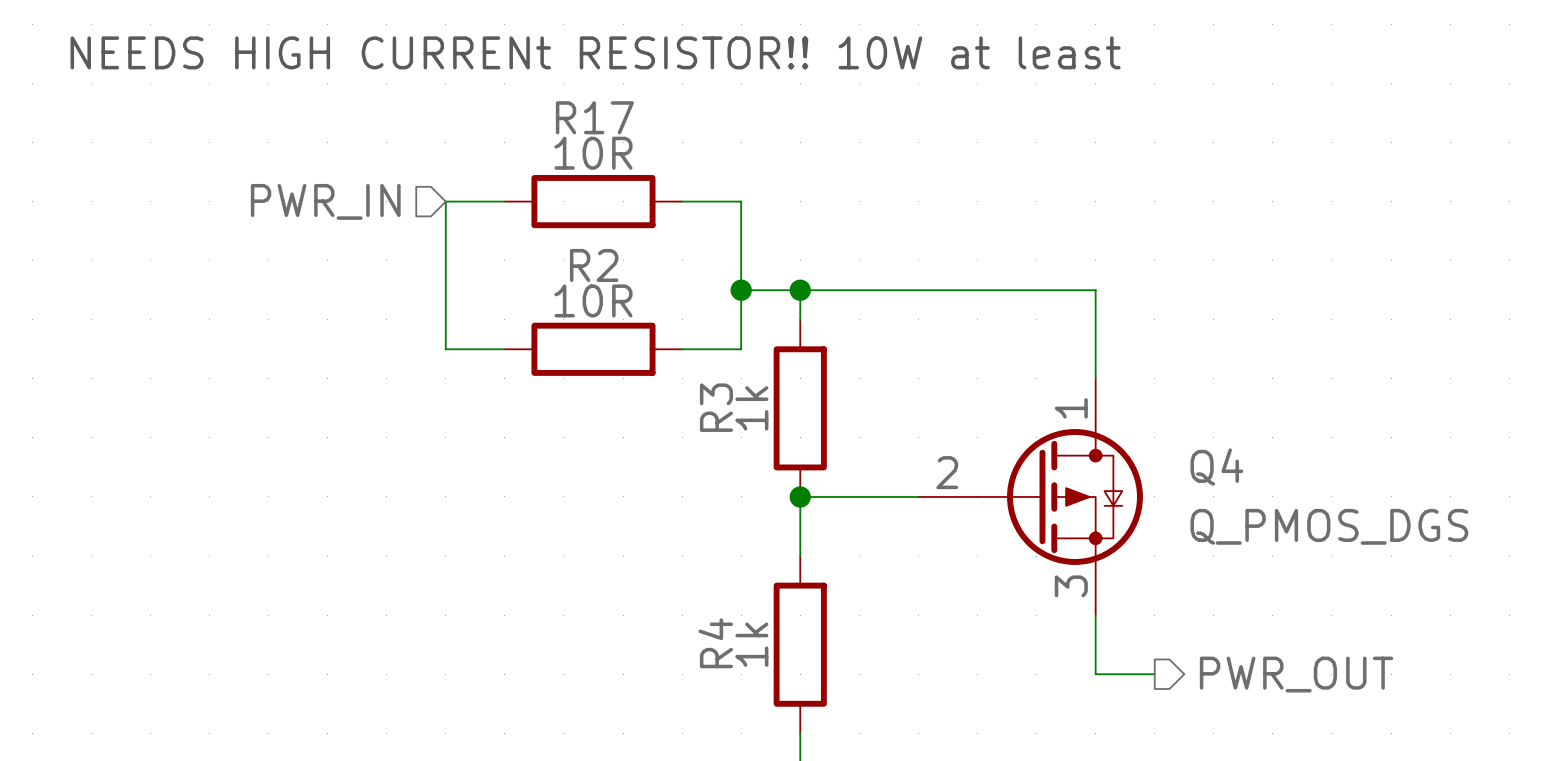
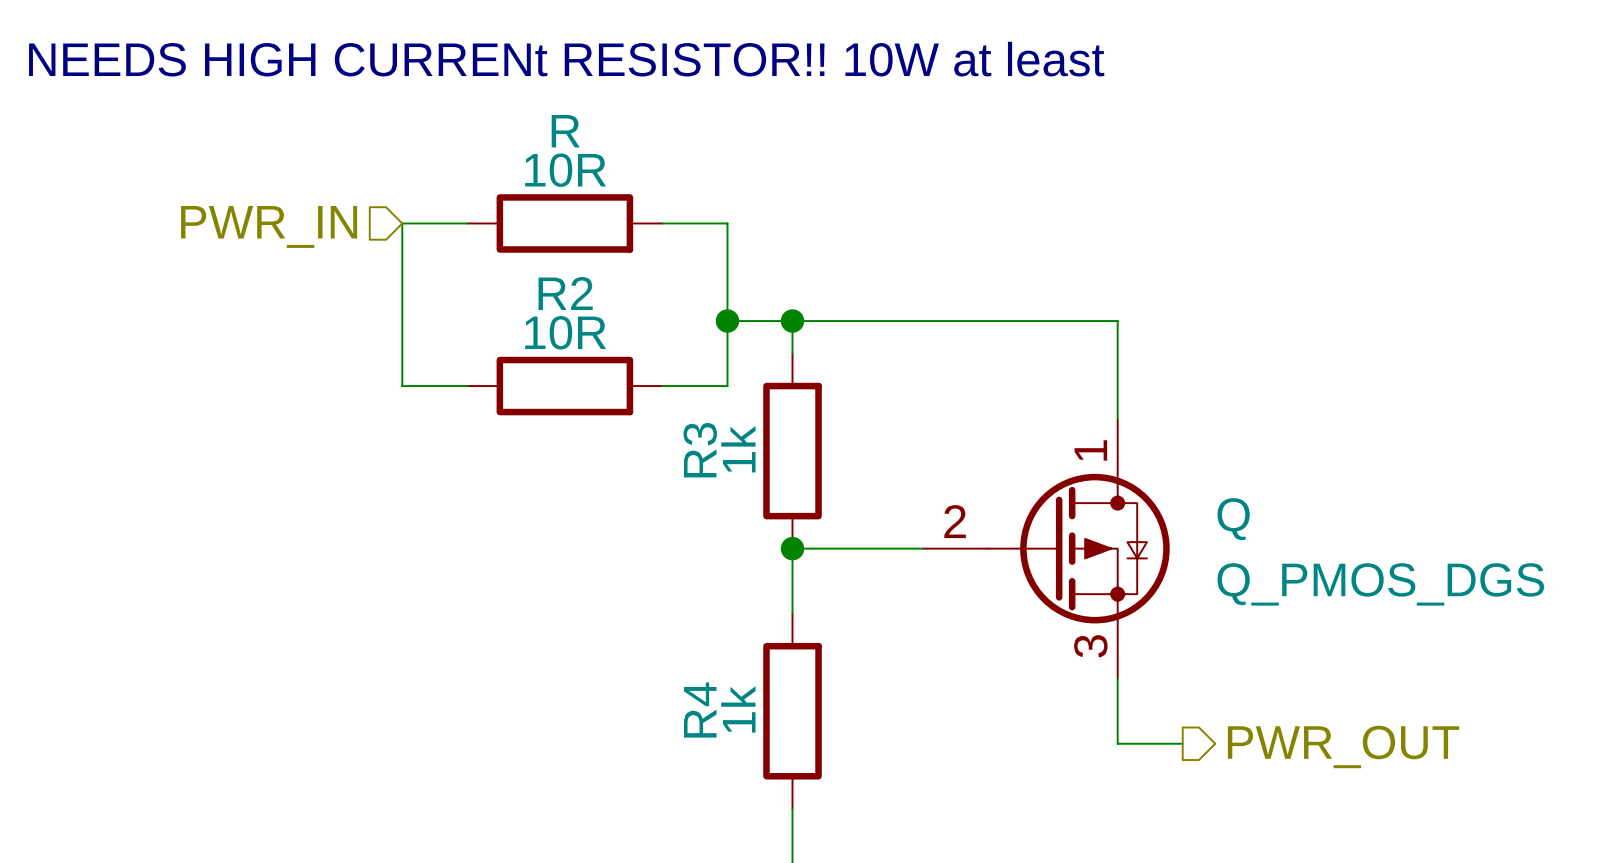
R17 name: R17 (594, 117) -> R (565, 131)
Q4 name: Q4 (1216, 467) -> Q (1233, 519)

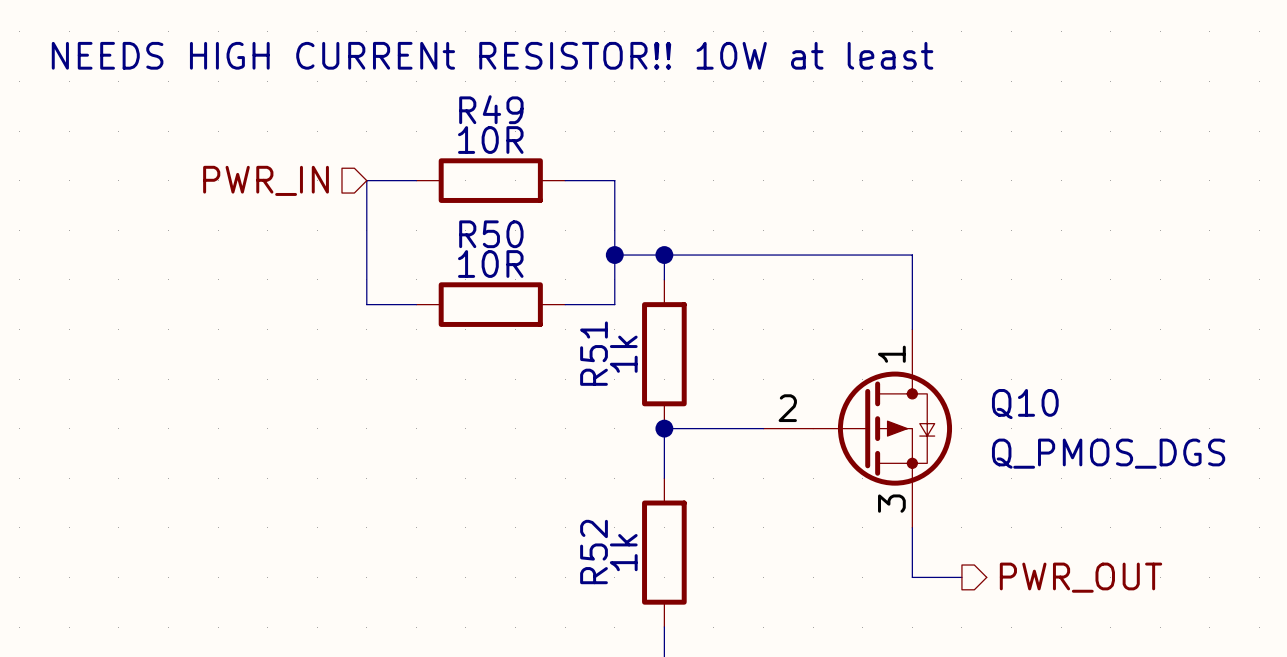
R name: R (565, 131) -> R49 (491, 109)
R2 name: R2 (565, 293) -> R50 (491, 234)
R3 name: R3 (700, 450) -> R51 (594, 353)
Q name: Q (1233, 519) -> Q10 (1025, 404)
R4 name: R4 (700, 709) -> R52 (594, 552)

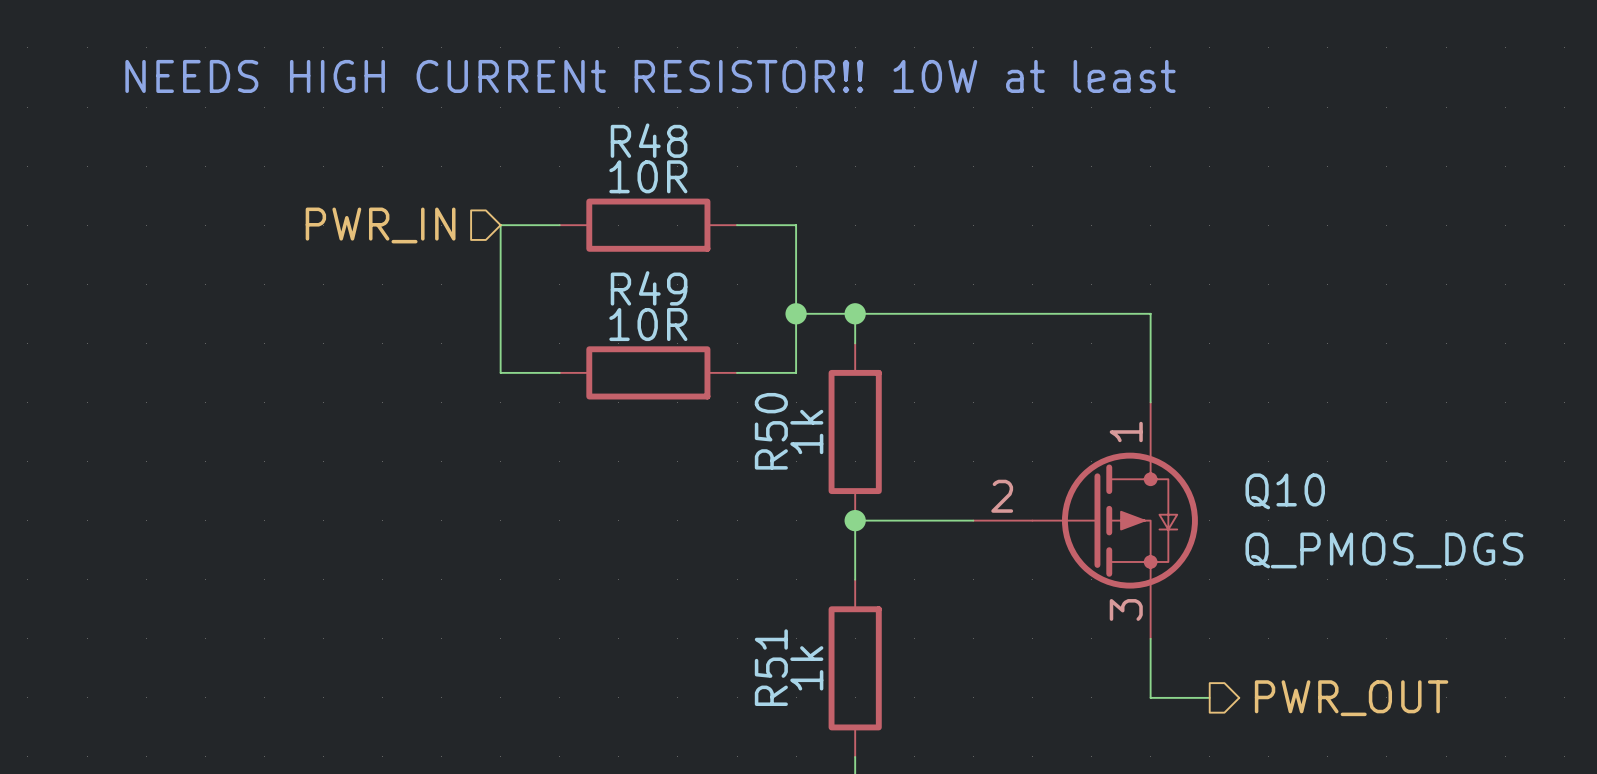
R49 name: R49 (491, 109) -> R48 (649, 140)
R50 name: R50 (491, 234) -> R49 (649, 288)
R51 name: R51 (594, 353) -> R50 (771, 431)
R52 name: R52 (594, 552) -> R51 (771, 667)

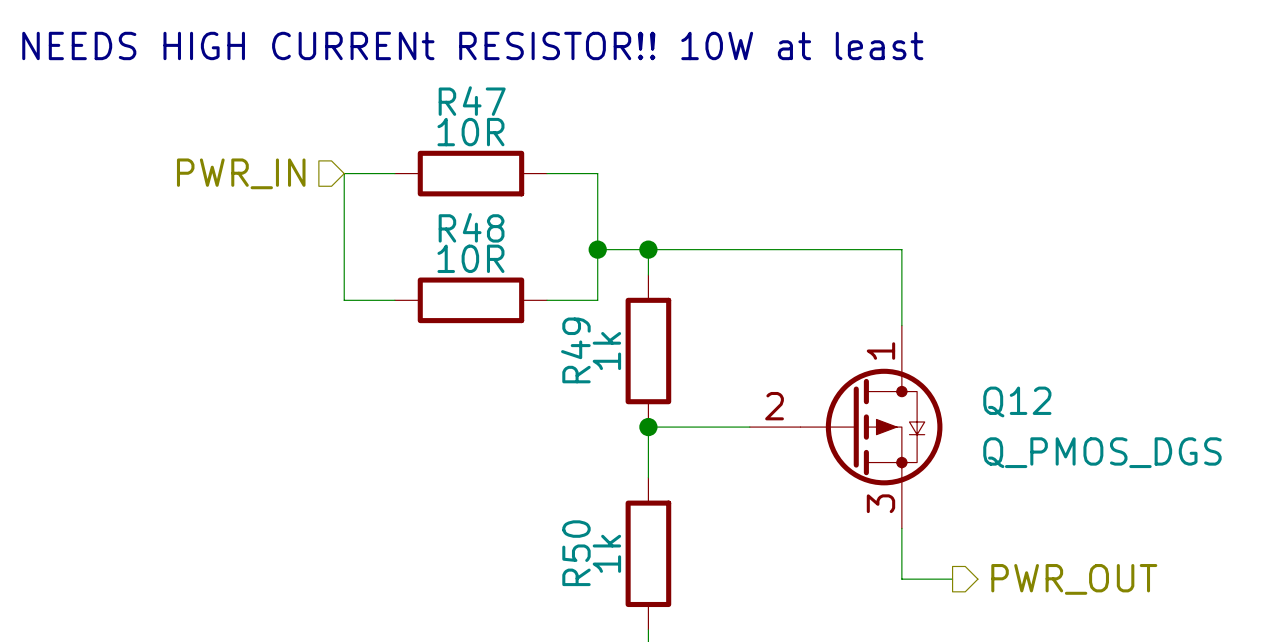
R48 name: R48 (649, 140) -> R47 (472, 101)
R49 name: R49 (649, 288) -> R48 (471, 227)
R50 name: R50 (771, 431) -> R49 (575, 350)
Q10 name: Q10 (1285, 491) -> Q12 (1017, 401)
R51 name: R51 (771, 667) -> R50 (576, 553)

